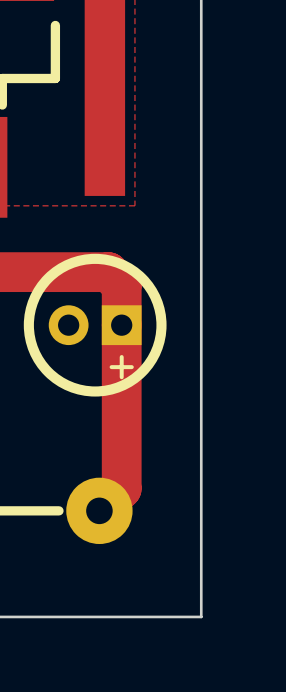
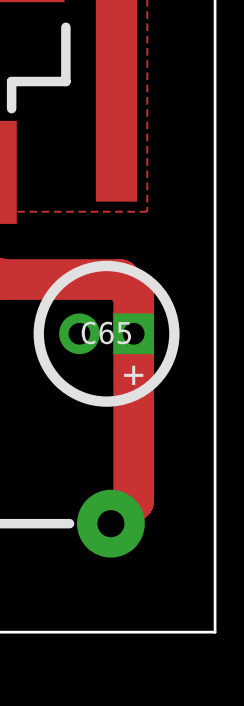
C65 name: none -> C65 (106, 332)

